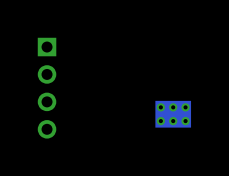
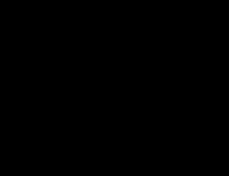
part: (47, 88) -> none
part: (173, 114) -> none

